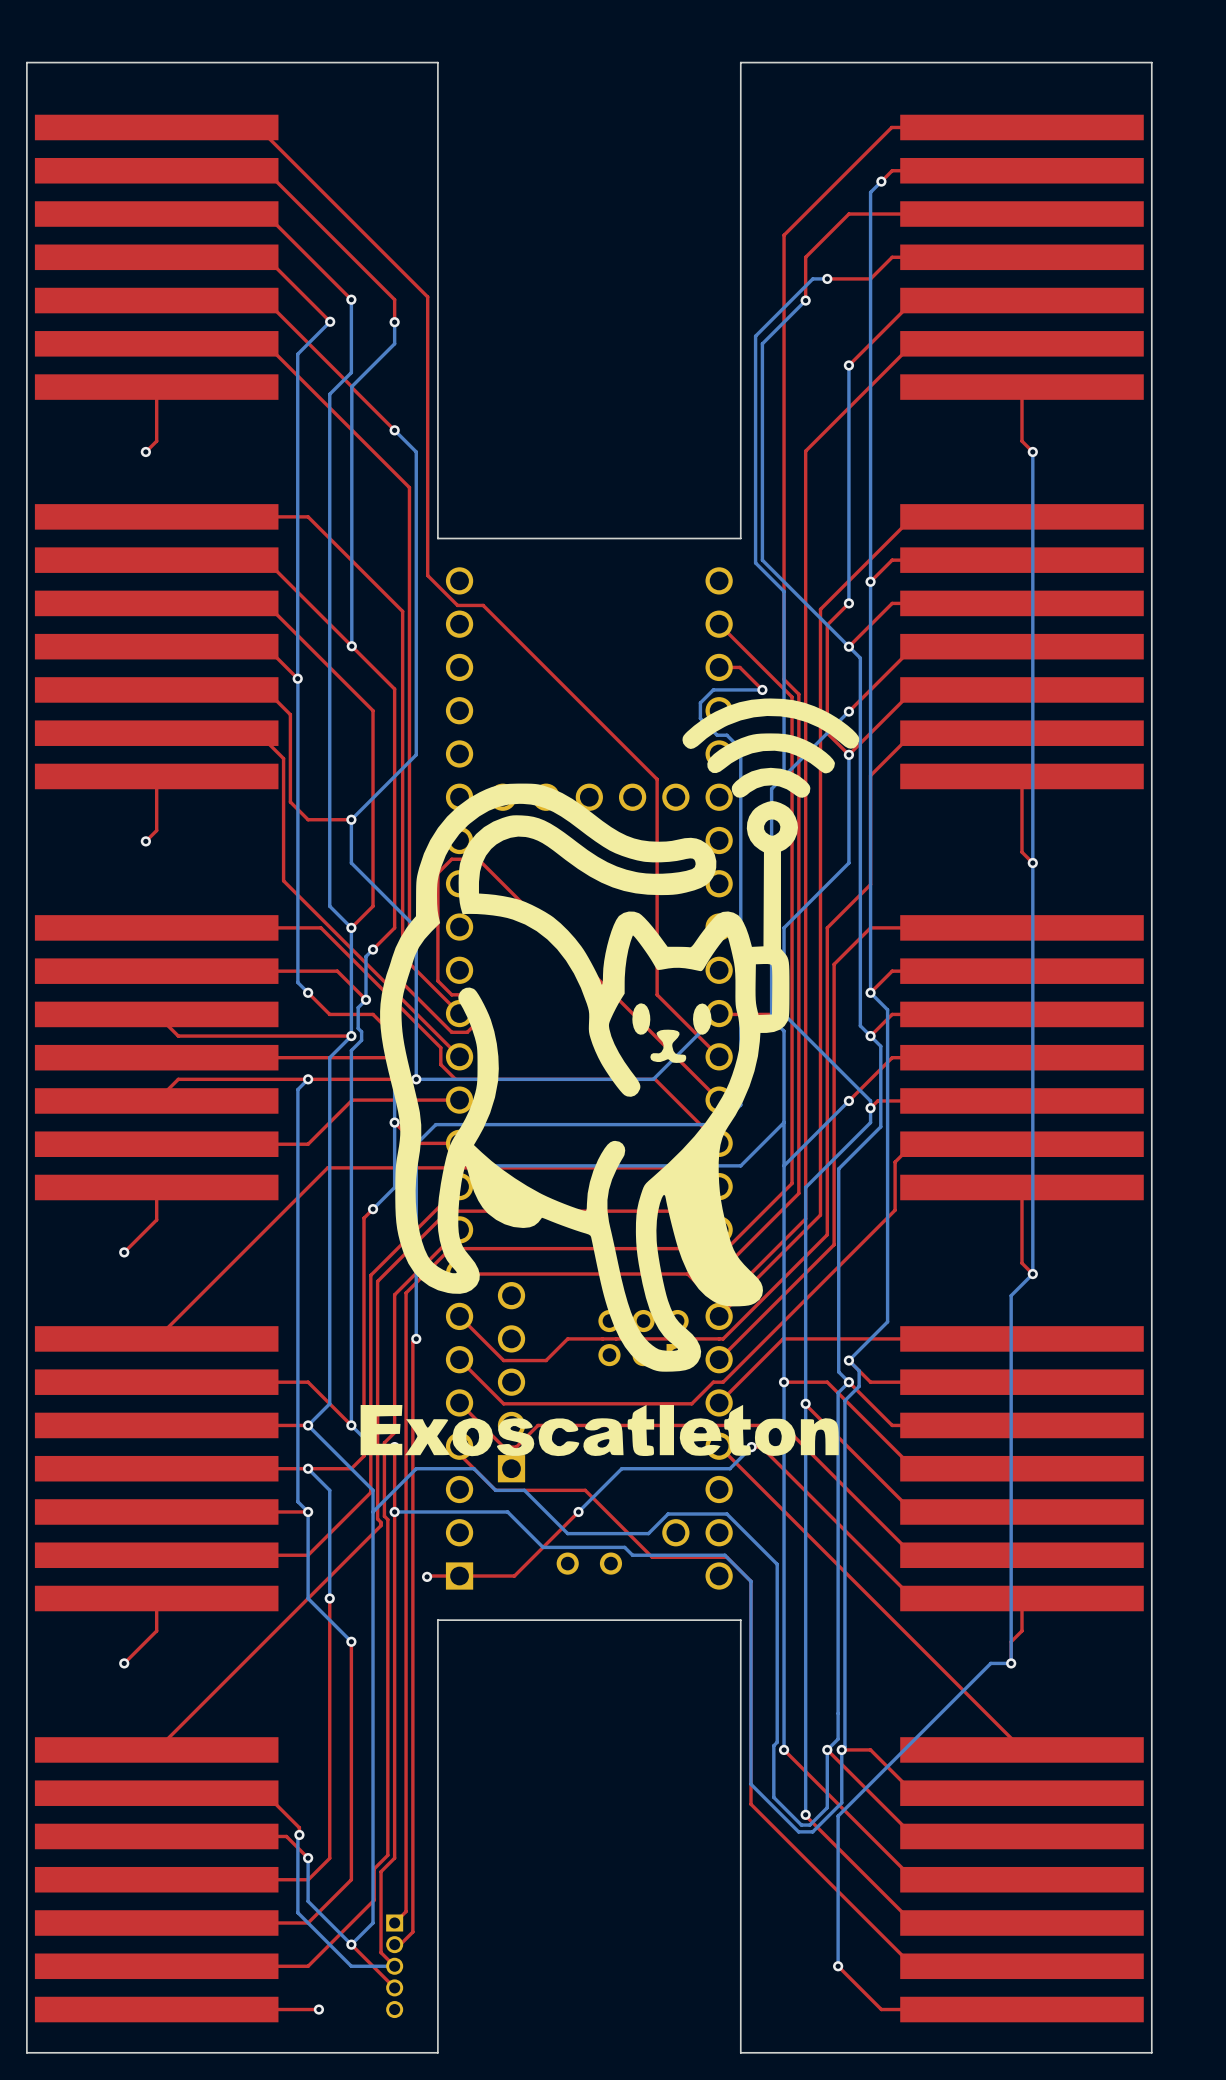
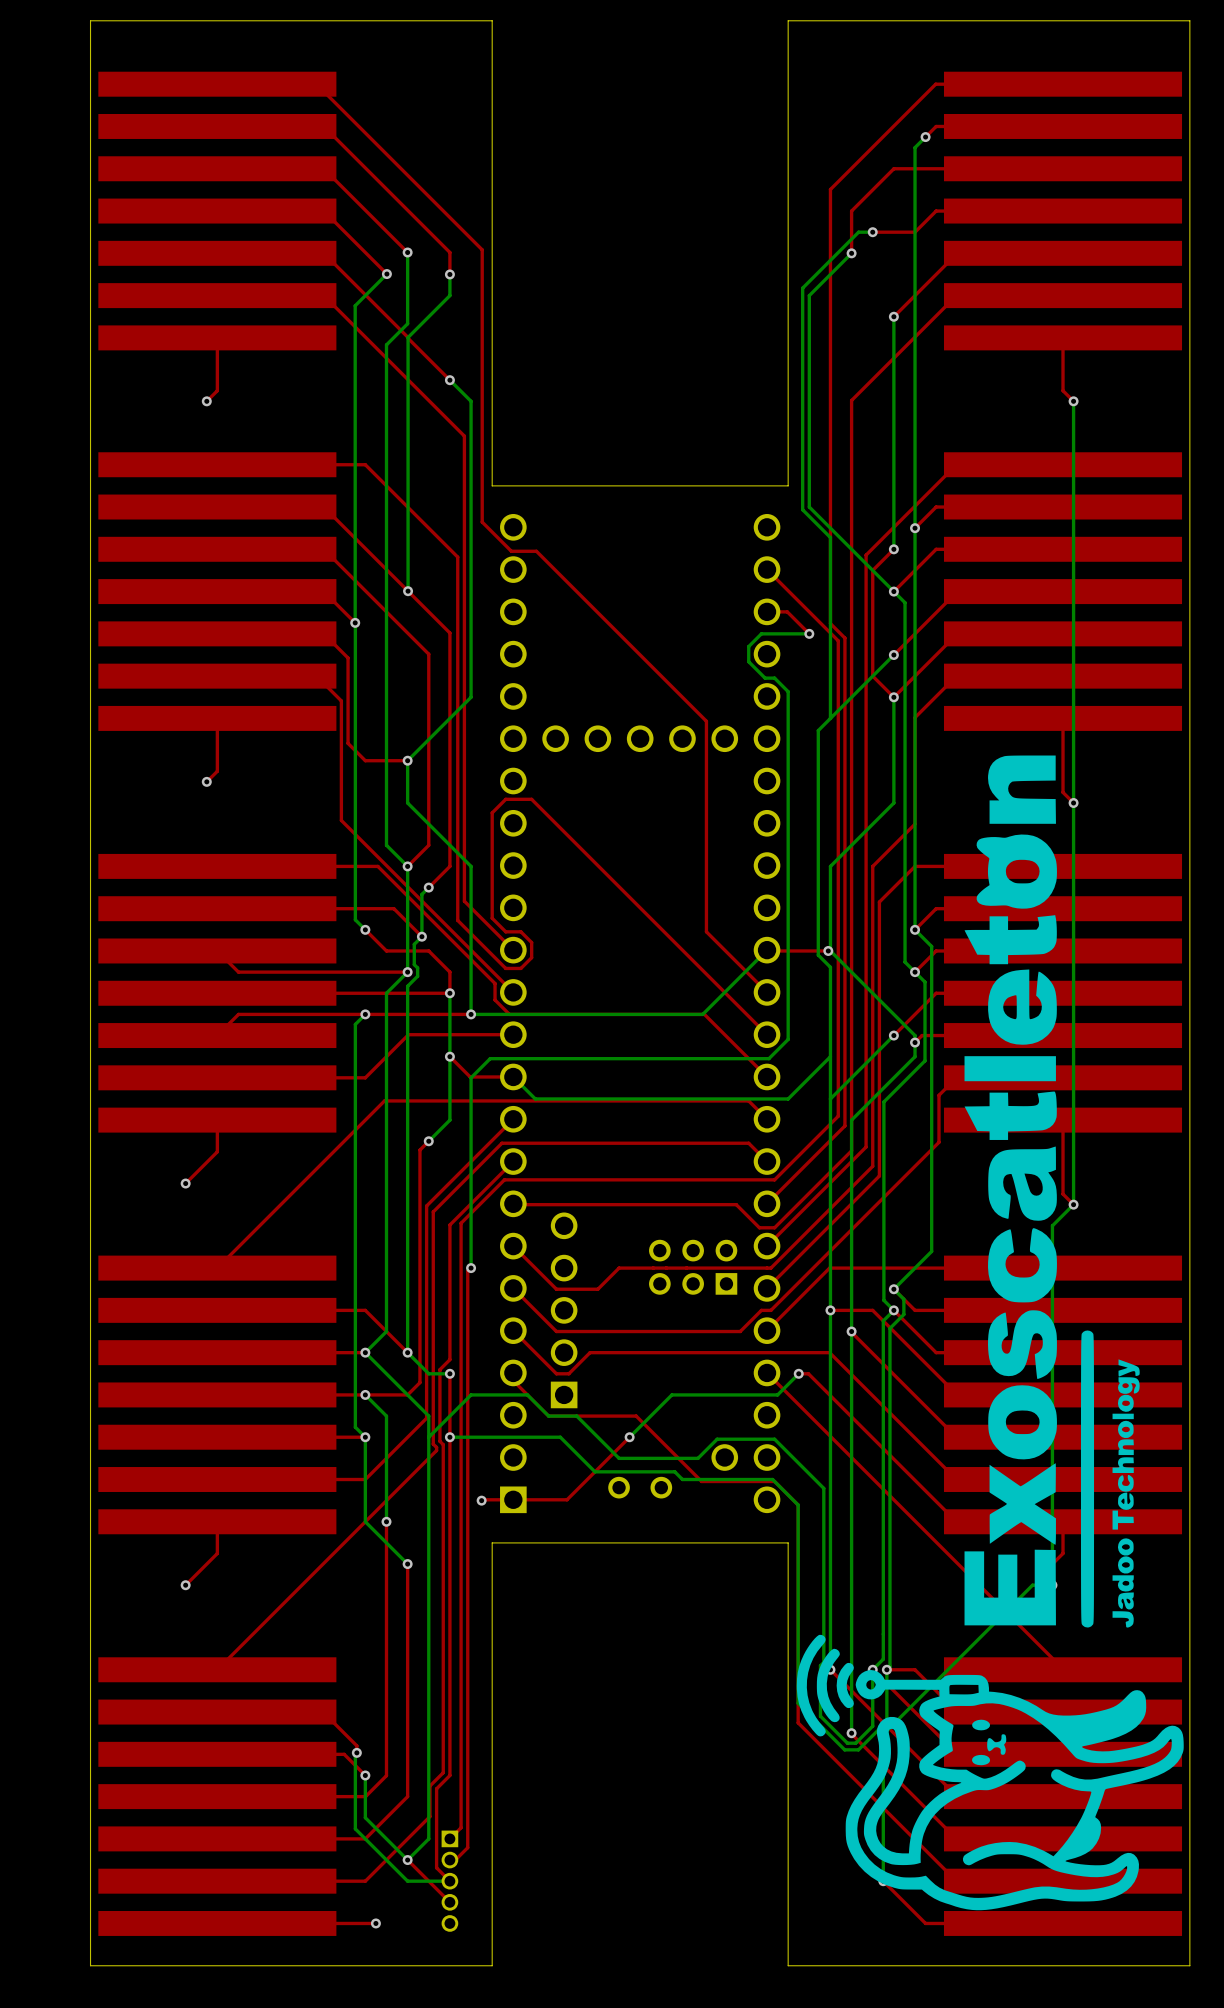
drawing: [360, 698, 860, 1457] -> none
drawing: none -> [796, 755, 1184, 1911]

